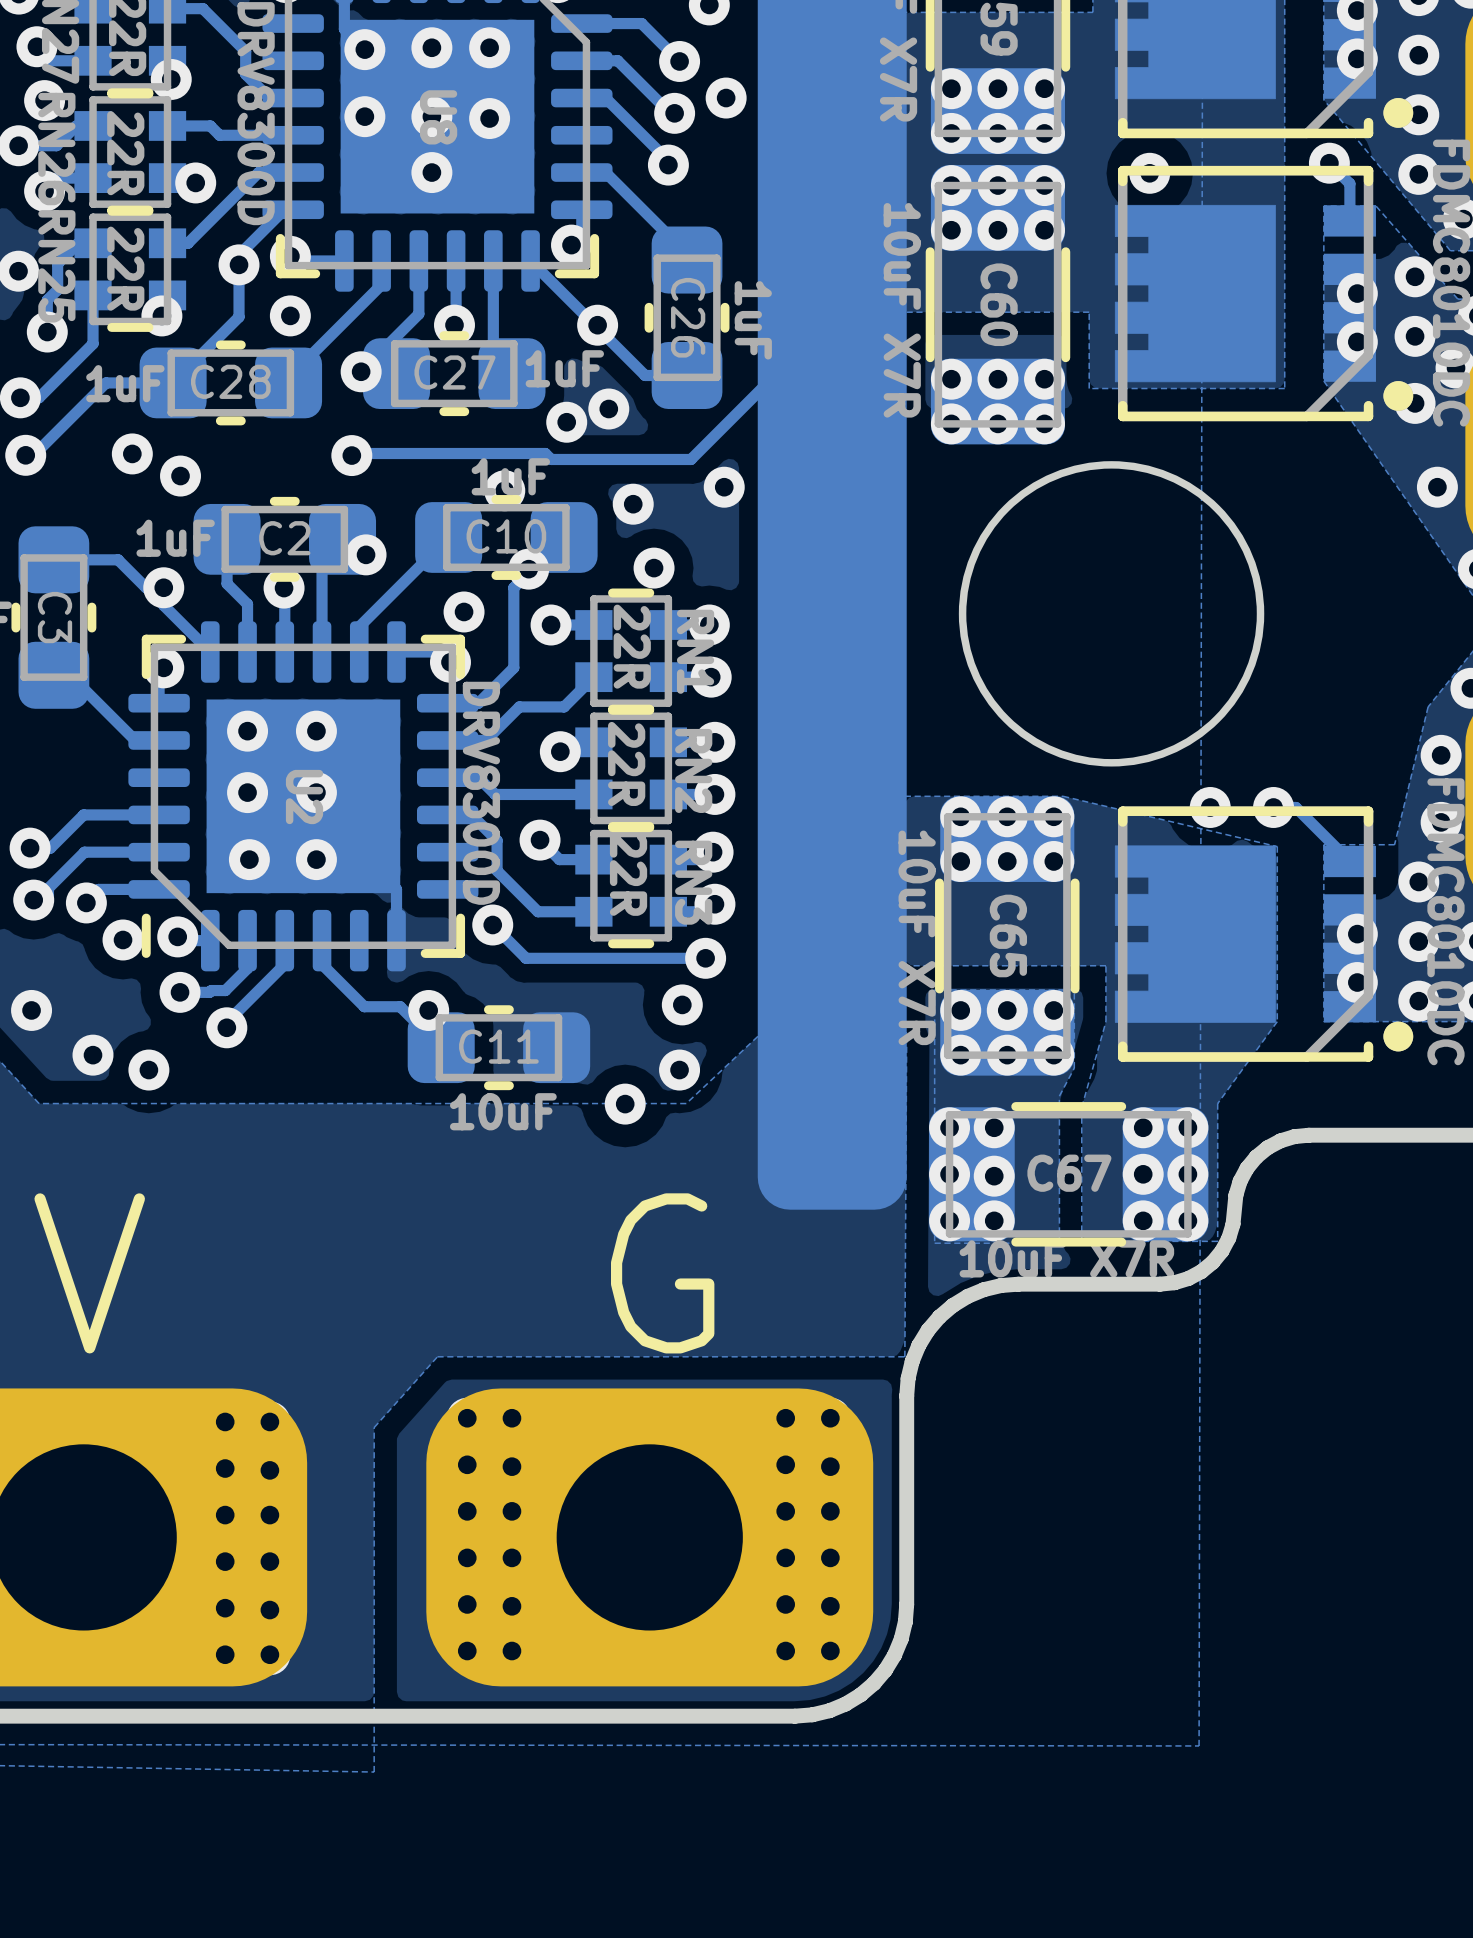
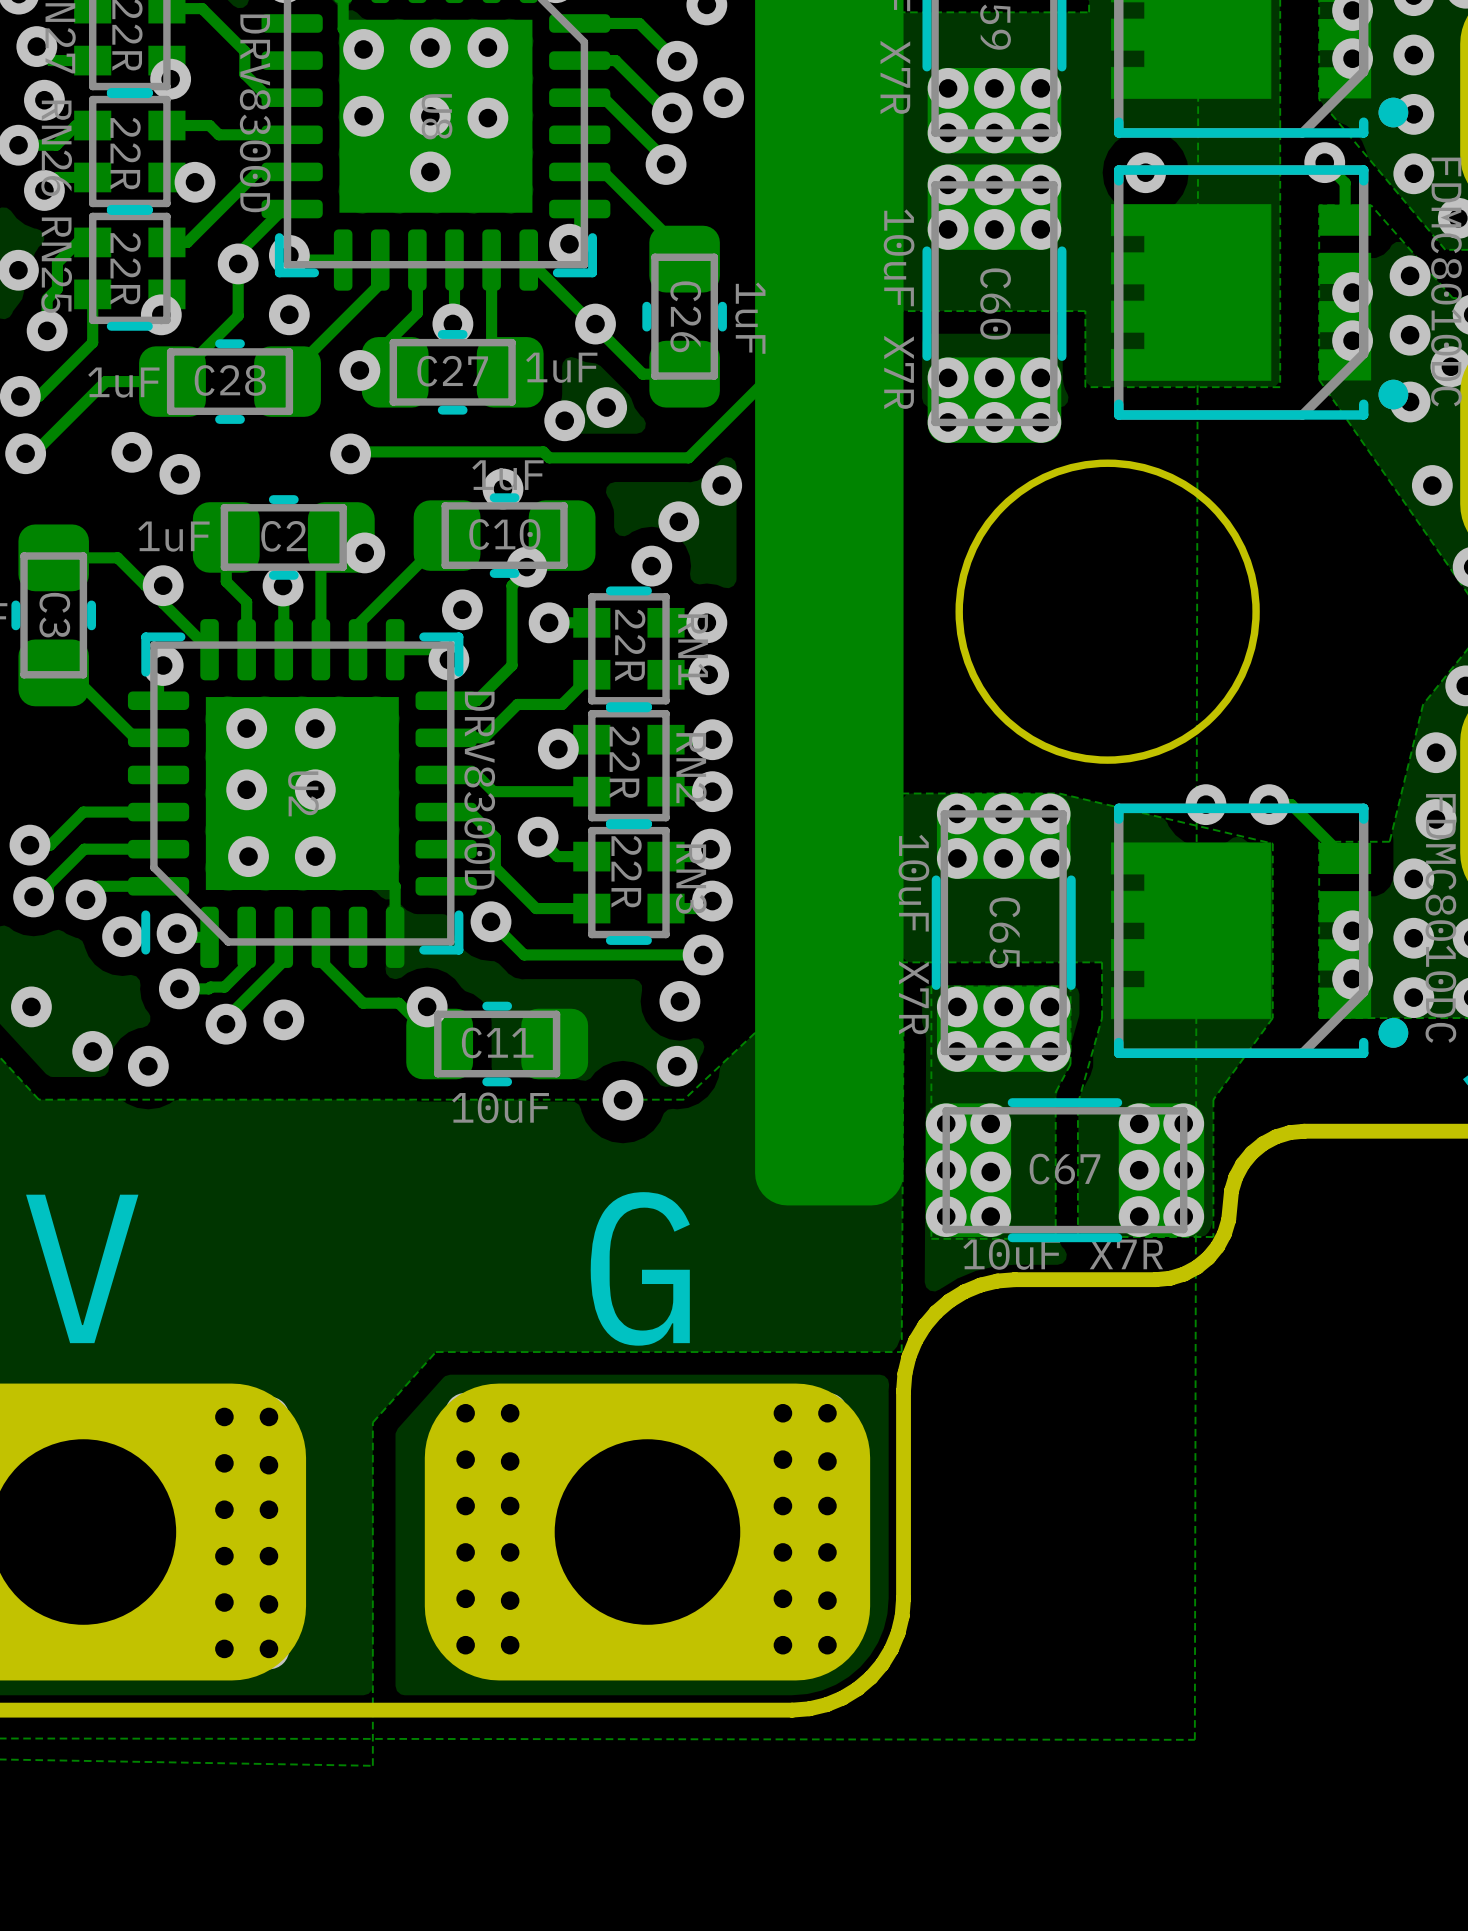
via position: (633, 504) -> (678, 521)
via: none -> (283, 1019)

